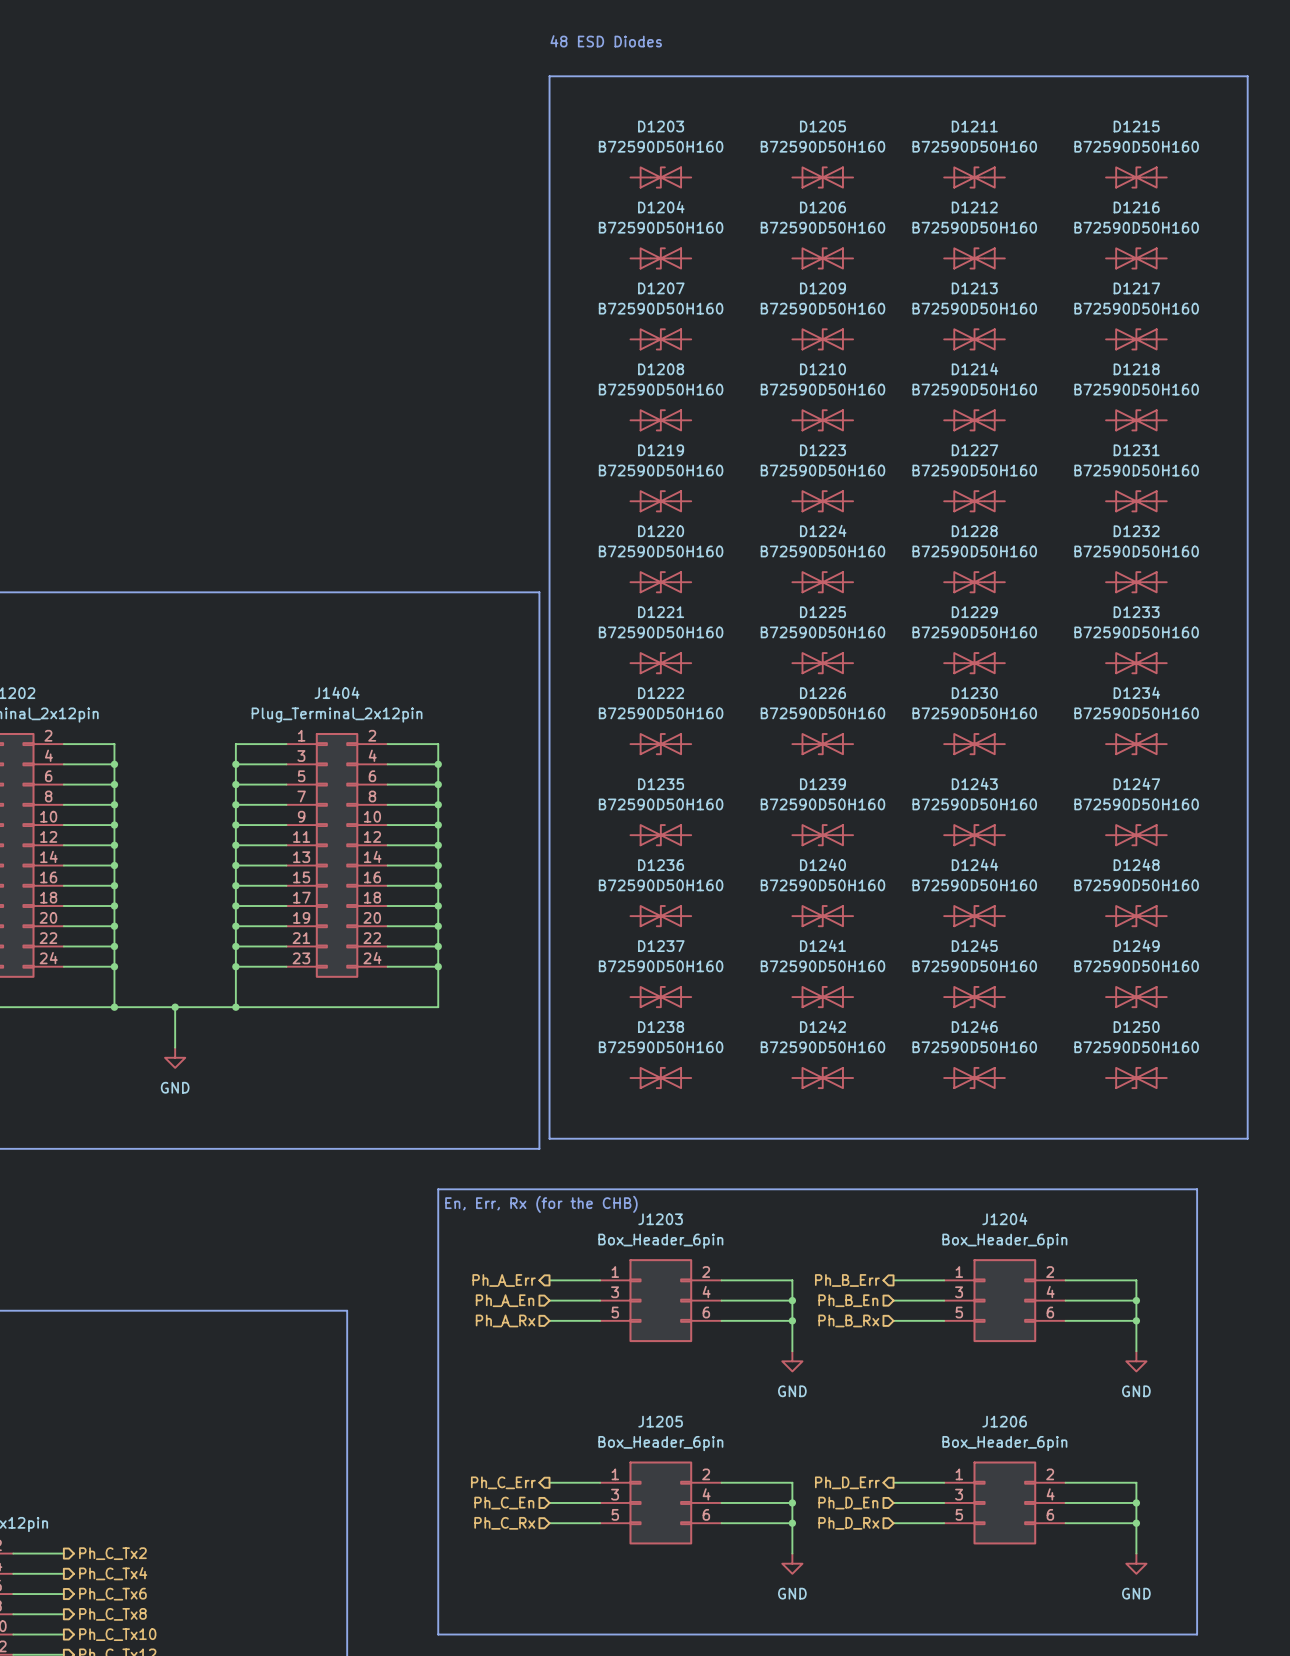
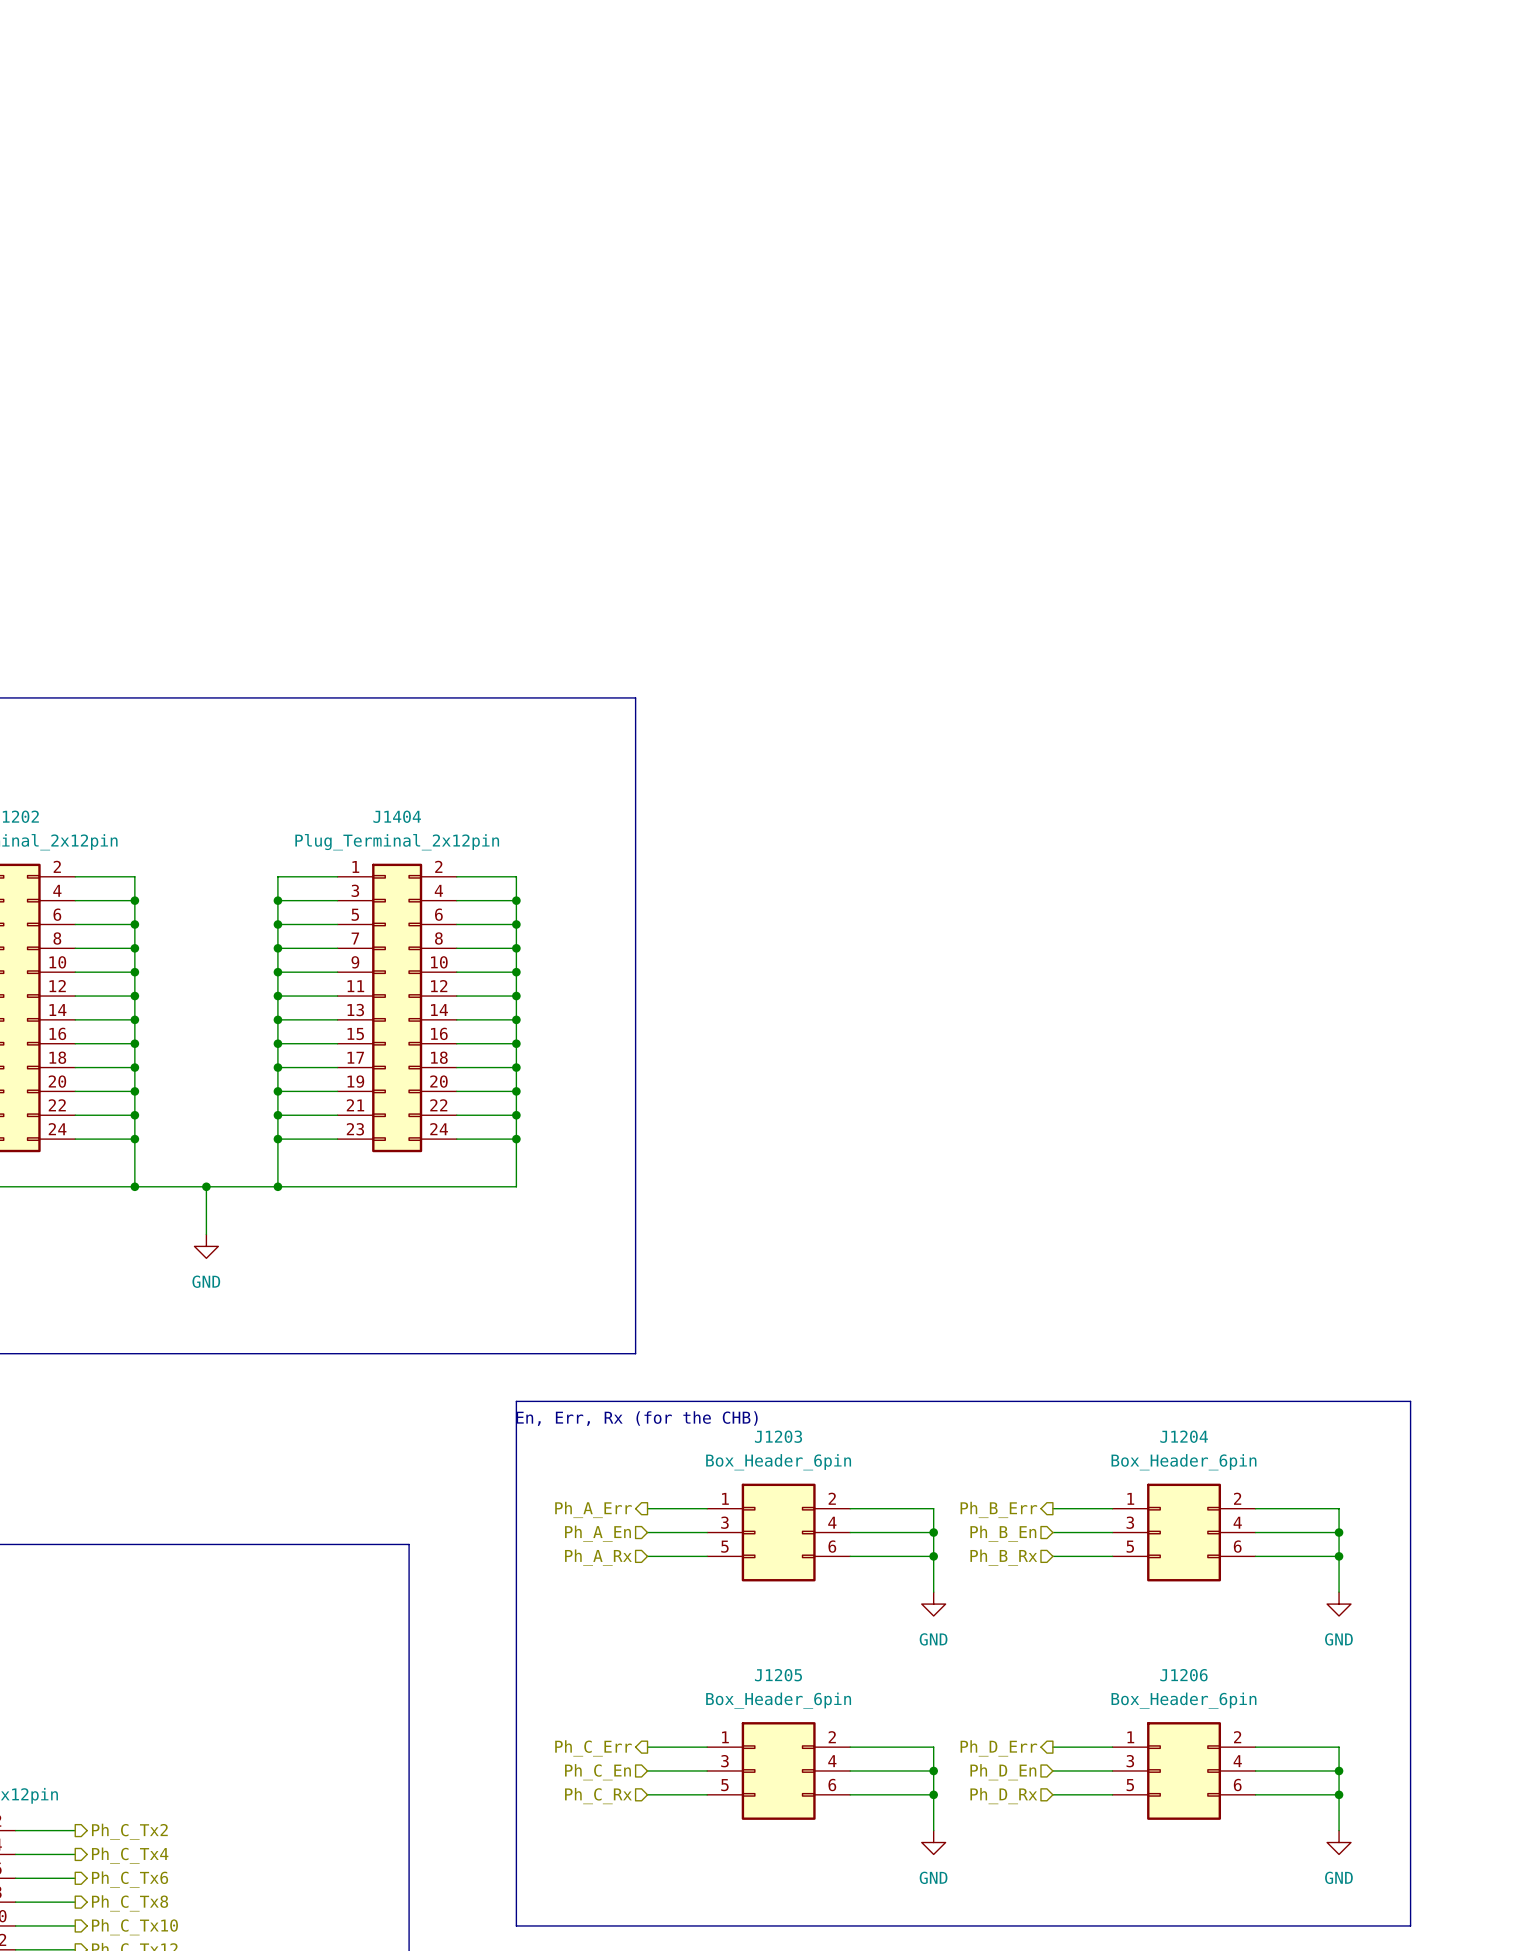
text: 48 ESD Diodes (606, 41) -> none
line: (549, 76) (1247, 76) (1247, 1138) (549, 1138) (549, 76) -> none
D1203: B72590D50H160 (660, 177) -> none
D1205: B72590D50H160 (822, 177) -> none
D1211: B72590D50H160 (974, 177) -> none
D1215: B72590D50H160 (1136, 177) -> none
D1204: B72590D50H160 (660, 258) -> none
D1206: B72590D50H160 (822, 258) -> none
D1212: B72590D50H160 (974, 258) -> none
D1216: B72590D50H160 (1136, 258) -> none
D1207: B72590D50H160 (660, 339) -> none
D1209: B72590D50H160 (822, 339) -> none
D1213: B72590D50H160 (974, 339) -> none
D1217: B72590D50H160 (1136, 339) -> none
D1208: B72590D50H160 (660, 420) -> none
D1210: B72590D50H160 (822, 420) -> none
D1214: B72590D50H160 (974, 420) -> none
D1218: B72590D50H160 (1136, 420) -> none
D1219: B72590D50H160 (660, 501) -> none
D1223: B72590D50H160 (822, 501) -> none
D1227: B72590D50H160 (974, 501) -> none
D1231: B72590D50H160 (1136, 501) -> none
D1220: B72590D50H160 (660, 582) -> none
D1224: B72590D50H160 (822, 582) -> none
D1228: B72590D50H160 (974, 582) -> none
D1232: B72590D50H160 (1136, 582) -> none
D1221: B72590D50H160 (660, 663) -> none
D1225: B72590D50H160 (822, 663) -> none
D1229: B72590D50H160 (974, 663) -> none
D1233: B72590D50H160 (1136, 663) -> none
D1222: B72590D50H160 (660, 744) -> none
D1226: B72590D50H160 (822, 744) -> none
D1230: B72590D50H160 (974, 744) -> none
D1234: B72590D50H160 (1136, 744) -> none
D1235: B72590D50H160 (660, 835) -> none
D1239: B72590D50H160 (822, 835) -> none
D1243: B72590D50H160 (974, 835) -> none
D1247: B72590D50H160 (1136, 835) -> none
D1236: B72590D50H160 (660, 916) -> none
D1240: B72590D50H160 (822, 916) -> none
D1244: B72590D50H160 (974, 916) -> none
D1248: B72590D50H160 (1136, 916) -> none
D1237: B72590D50H160 (660, 997) -> none
D1241: B72590D50H160 (822, 997) -> none
D1245: B72590D50H160 (974, 997) -> none
D1249: B72590D50H160 (1136, 997) -> none
D1238: B72590D50H160 (660, 1078) -> none
D1242: B72590D50H160 (822, 1078) -> none
D1246: B72590D50H160 (974, 1078) -> none
D1250: B72590D50H160 (1136, 1078) -> none

